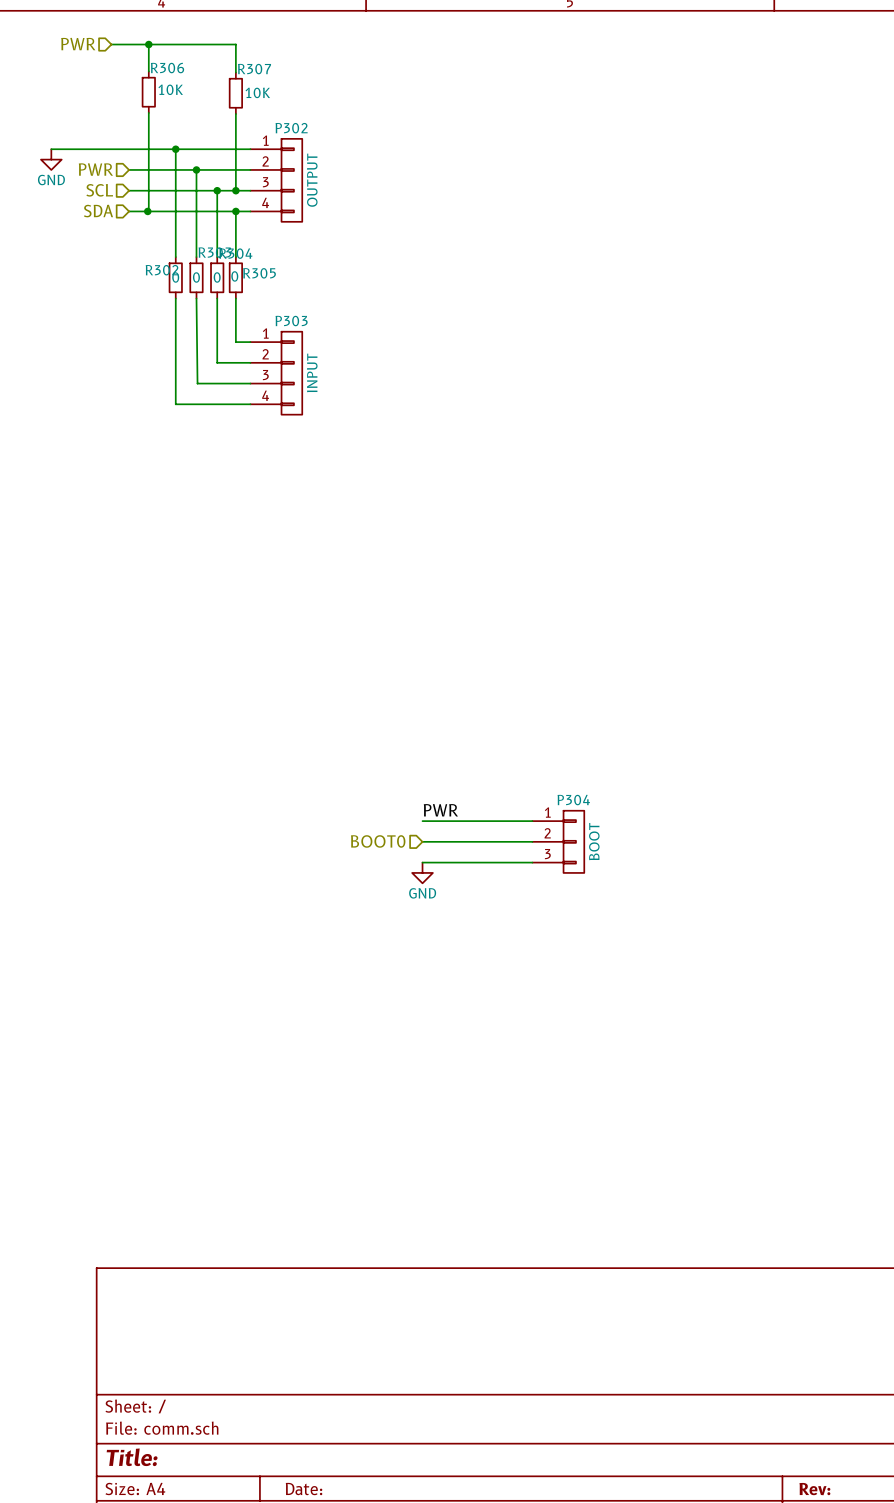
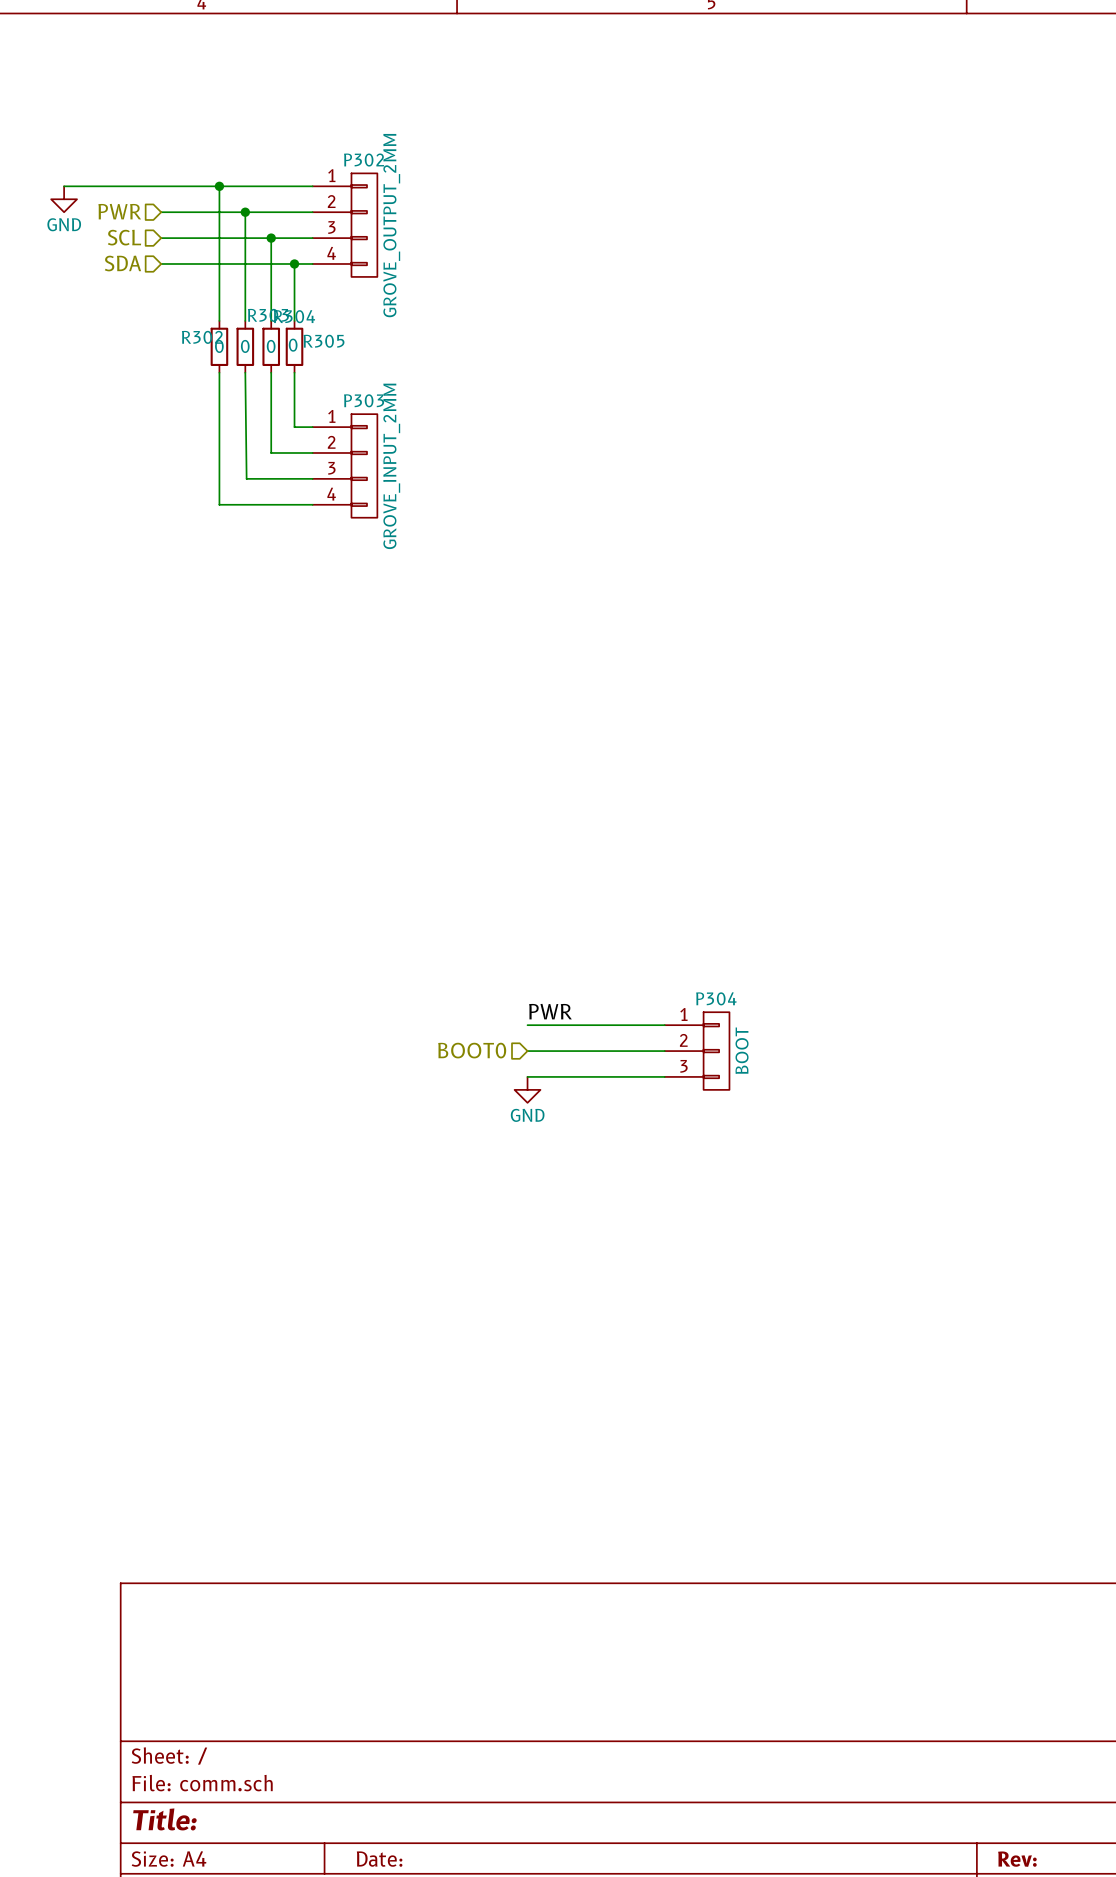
hierarchical label: PWR (78, 44) -> none
wire: (111, 44) (235, 44) (235, 72) -> none
wire: (148, 44) (148, 71) -> none
junction: (148, 44) -> none
R306: 10K (148, 92) -> none
R307: 10K (235, 93) -> none
wire: (148, 112) (148, 211) -> none
wire: (235, 113) (235, 190) -> none
P302 value: OUTPUT (312, 180) -> GROVE_OUTPUT_2MM (391, 225)
junction: (235, 190) -> none
junction: (147, 211) -> none
P303 value: INPUT (312, 372) -> GROVE_INPUT_2MM (391, 466)

